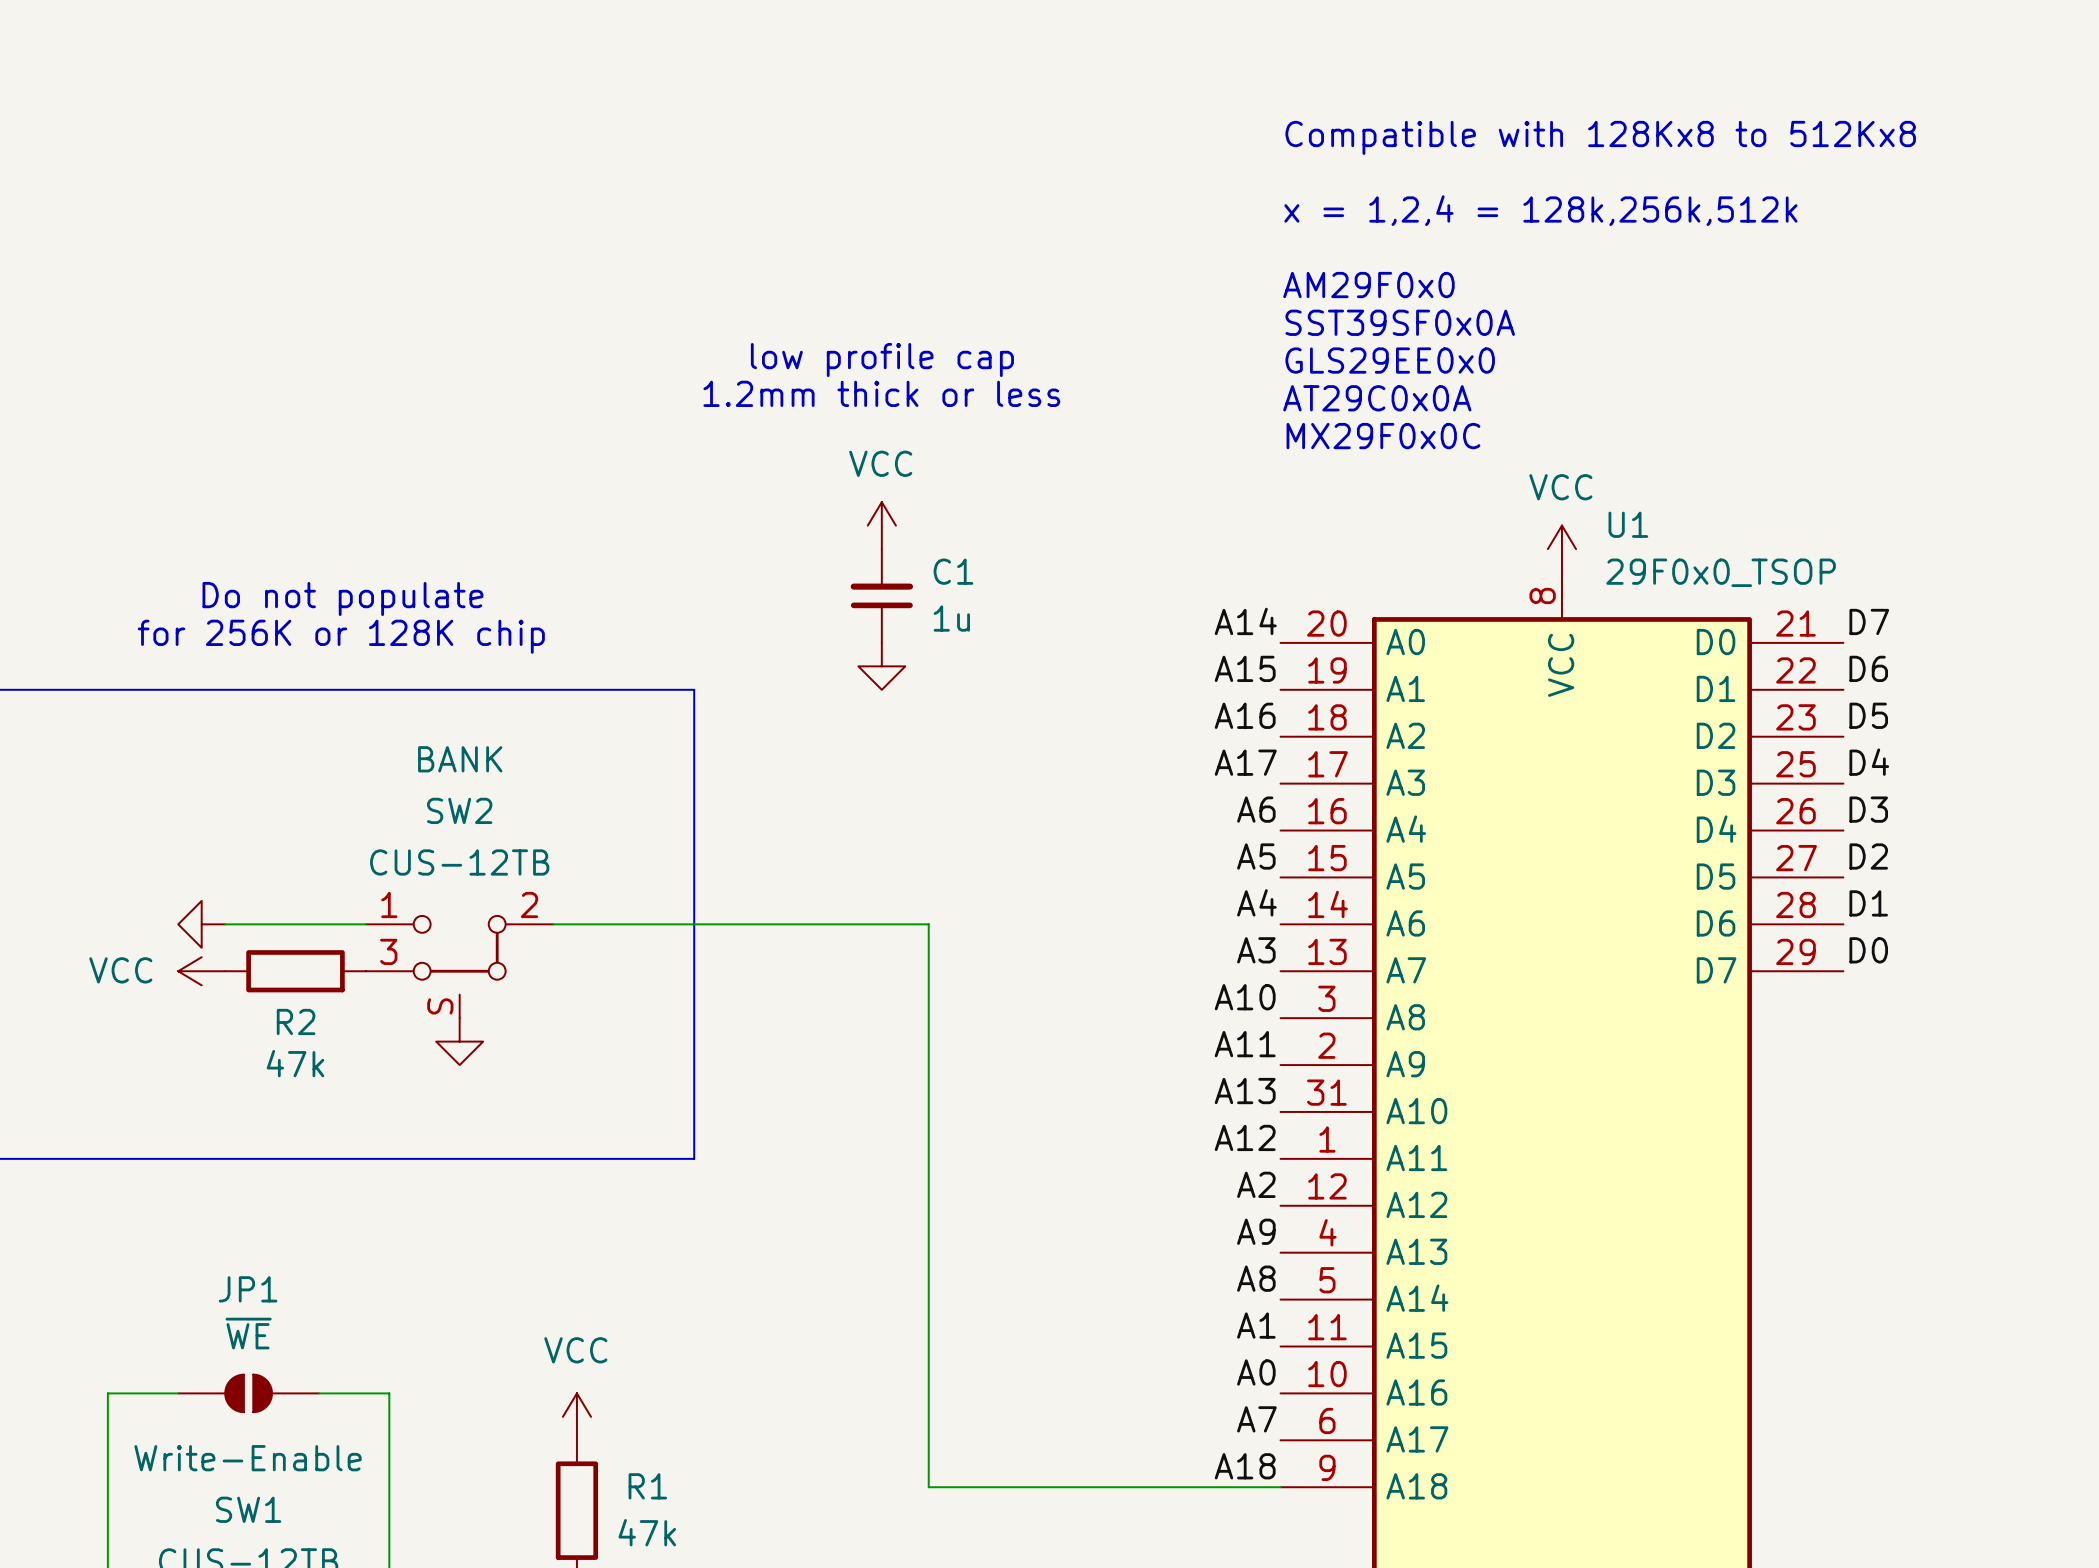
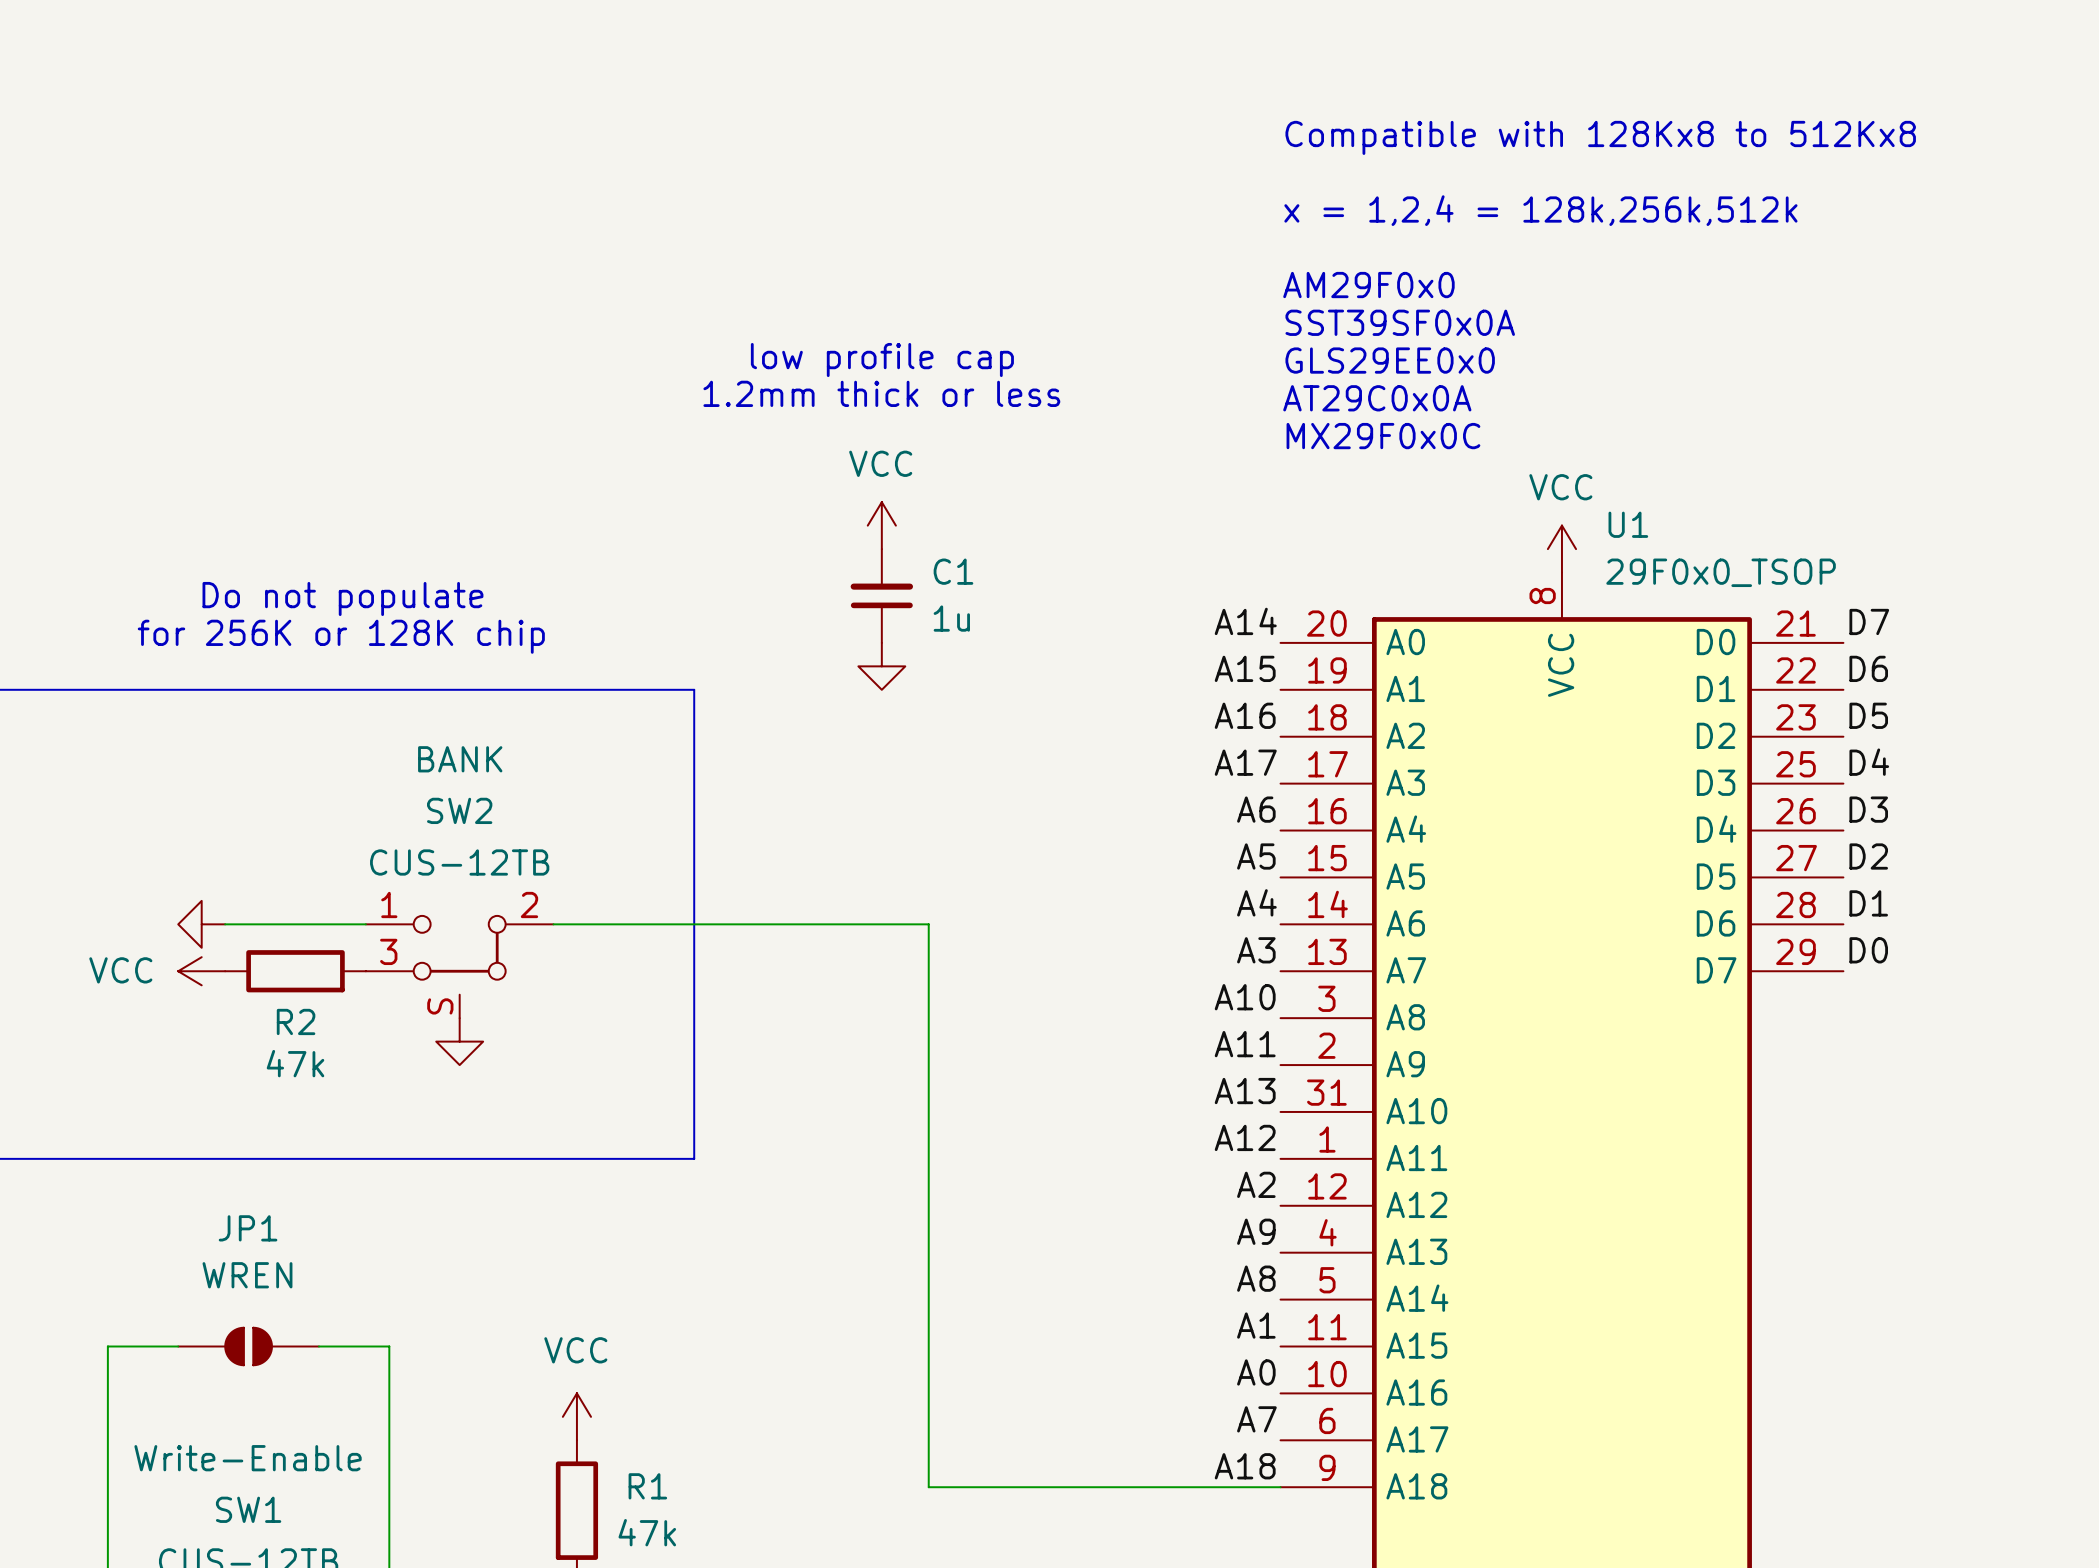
JP1 name position: JP1 (248, 1289) -> JP1 (248, 1228)
JP1 value: ~{WE} (248, 1333) -> WREN (247, 1275)
wire: (107, 1393) (178, 1393) -> (107, 1393) (107, 1346) (178, 1346)
JP1 position: (248, 1393) -> (248, 1346)
wire: (318, 1393) (389, 1393) -> (318, 1346) (389, 1346) (389, 1393)

